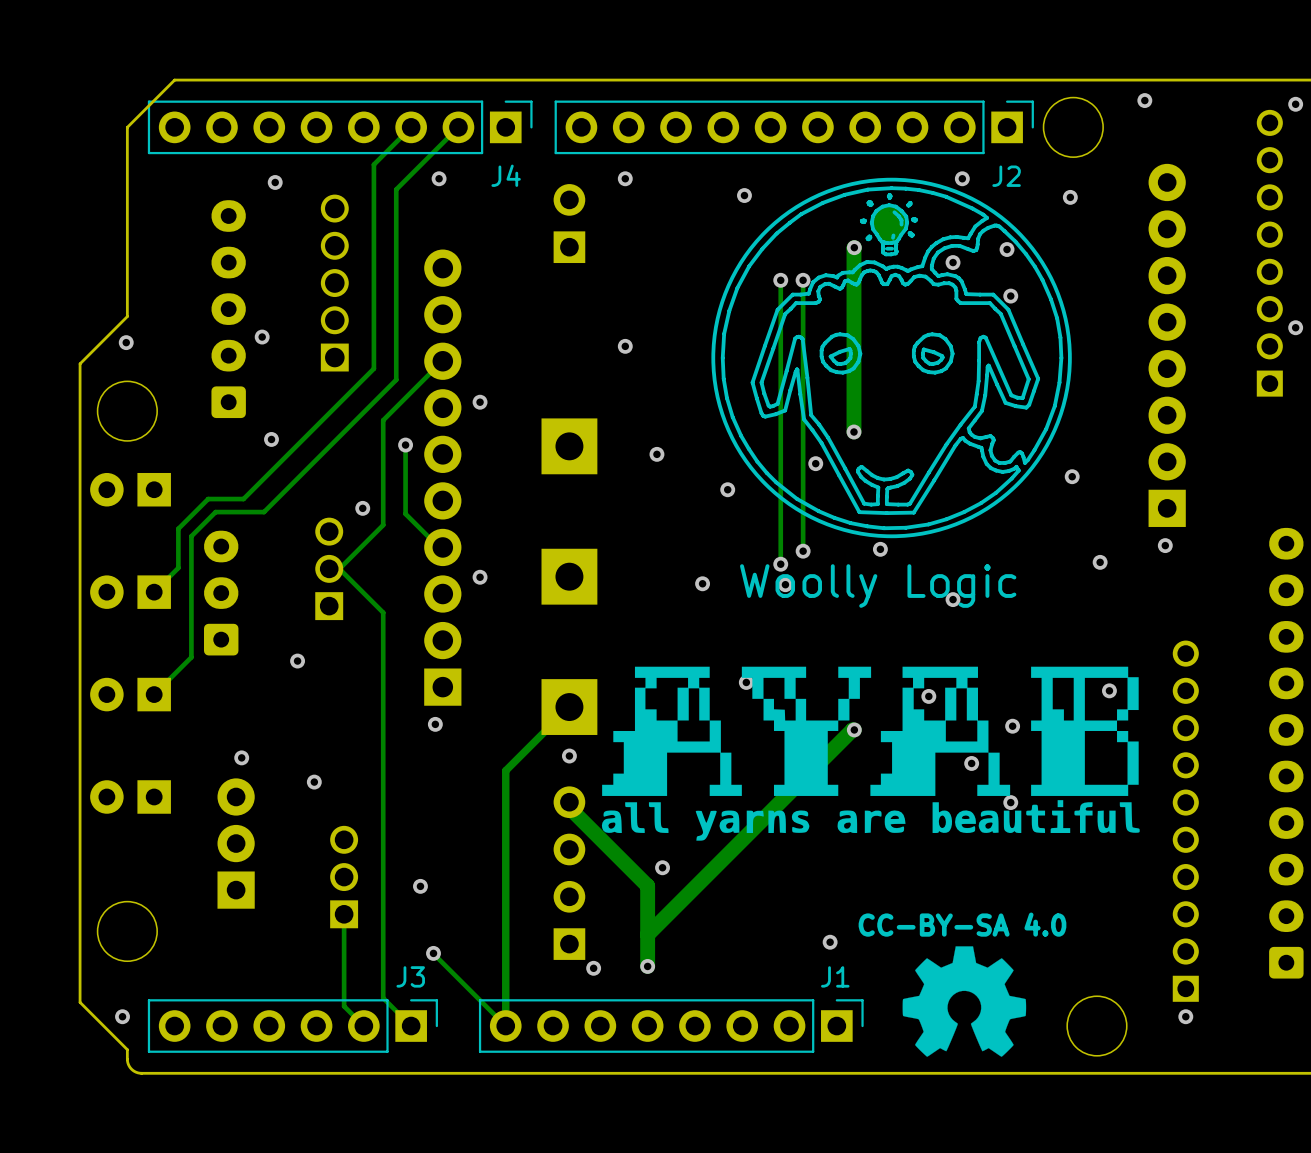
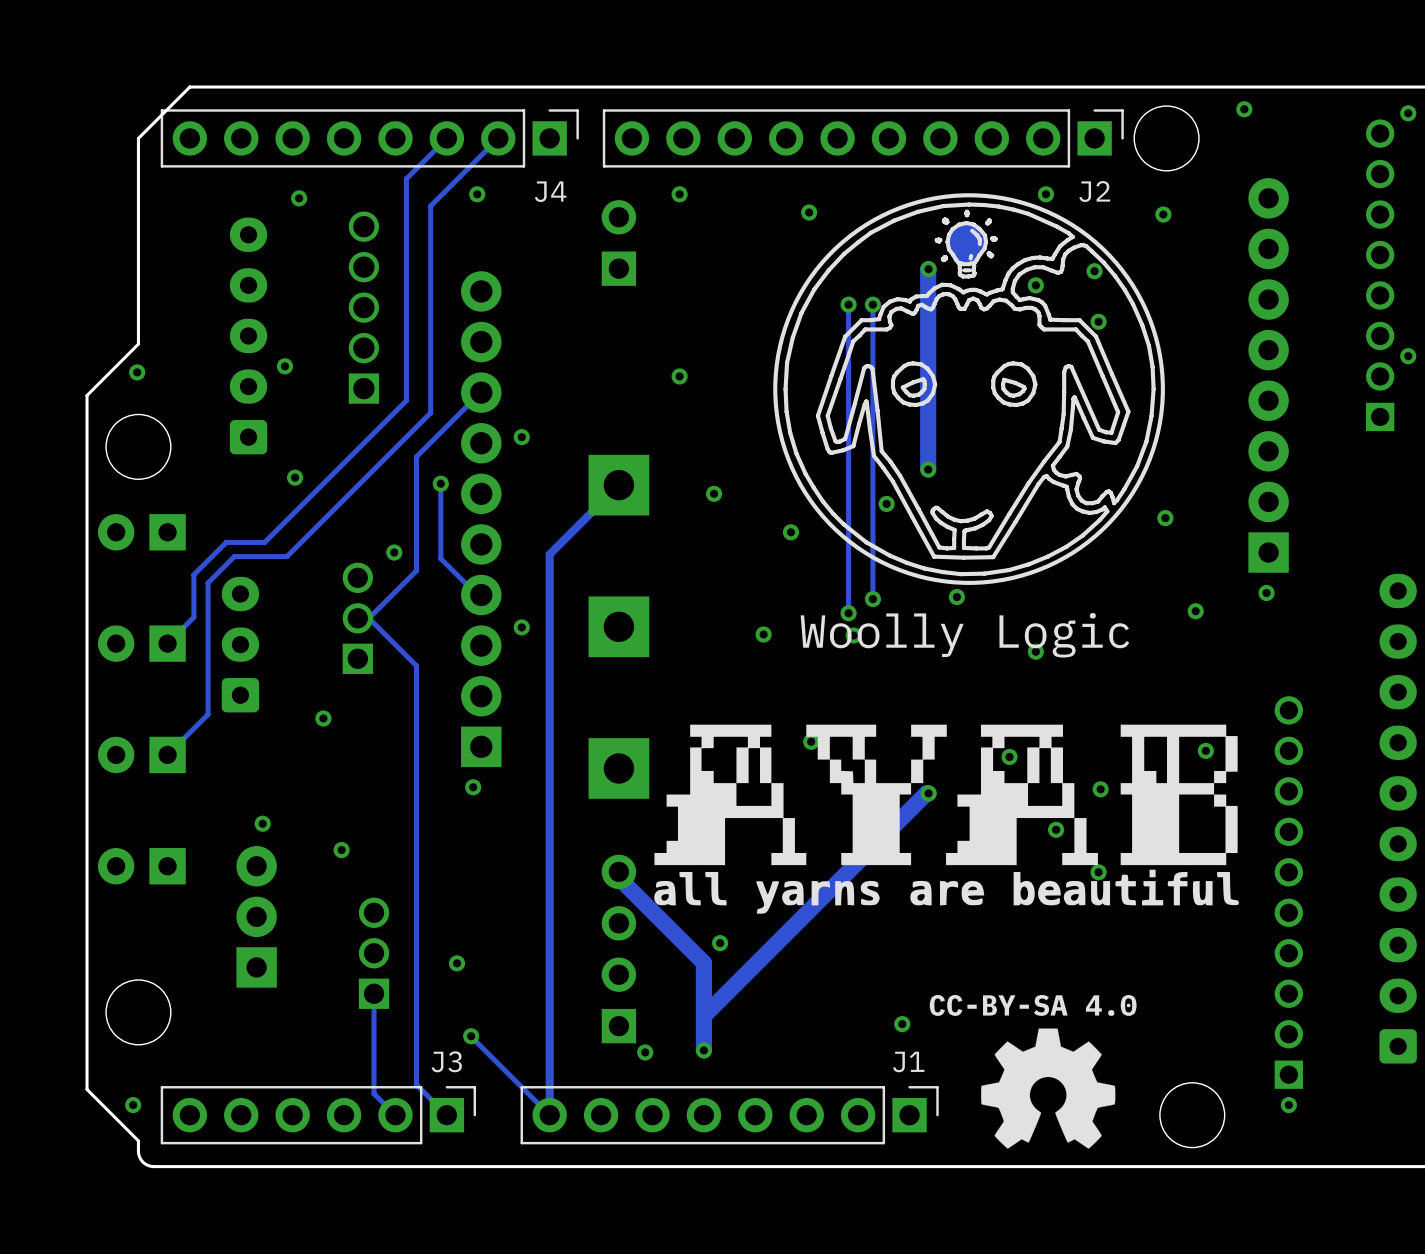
track: (569, 707) (505, 770) -> (618, 485) (549, 554) (549, 837)
via: (569, 756) -> none

